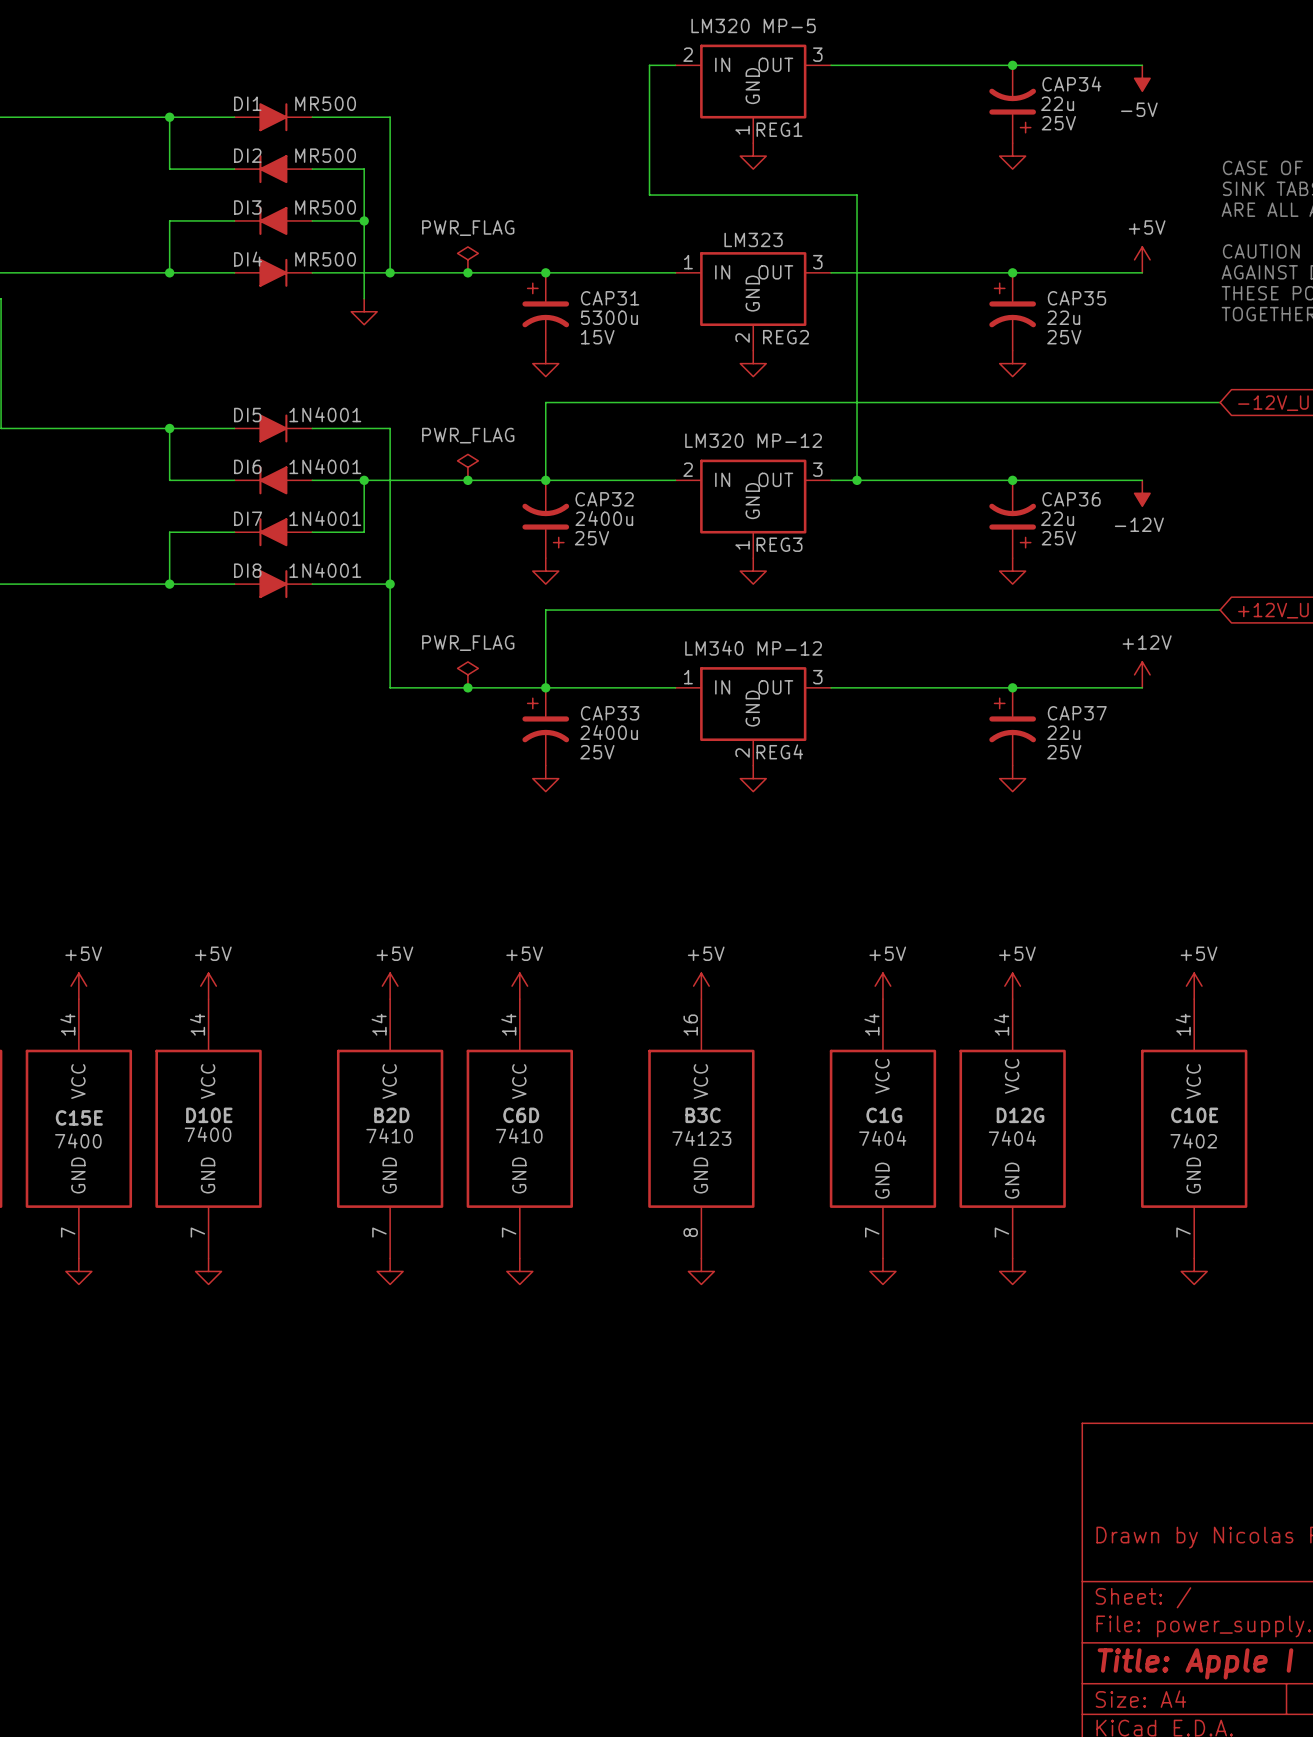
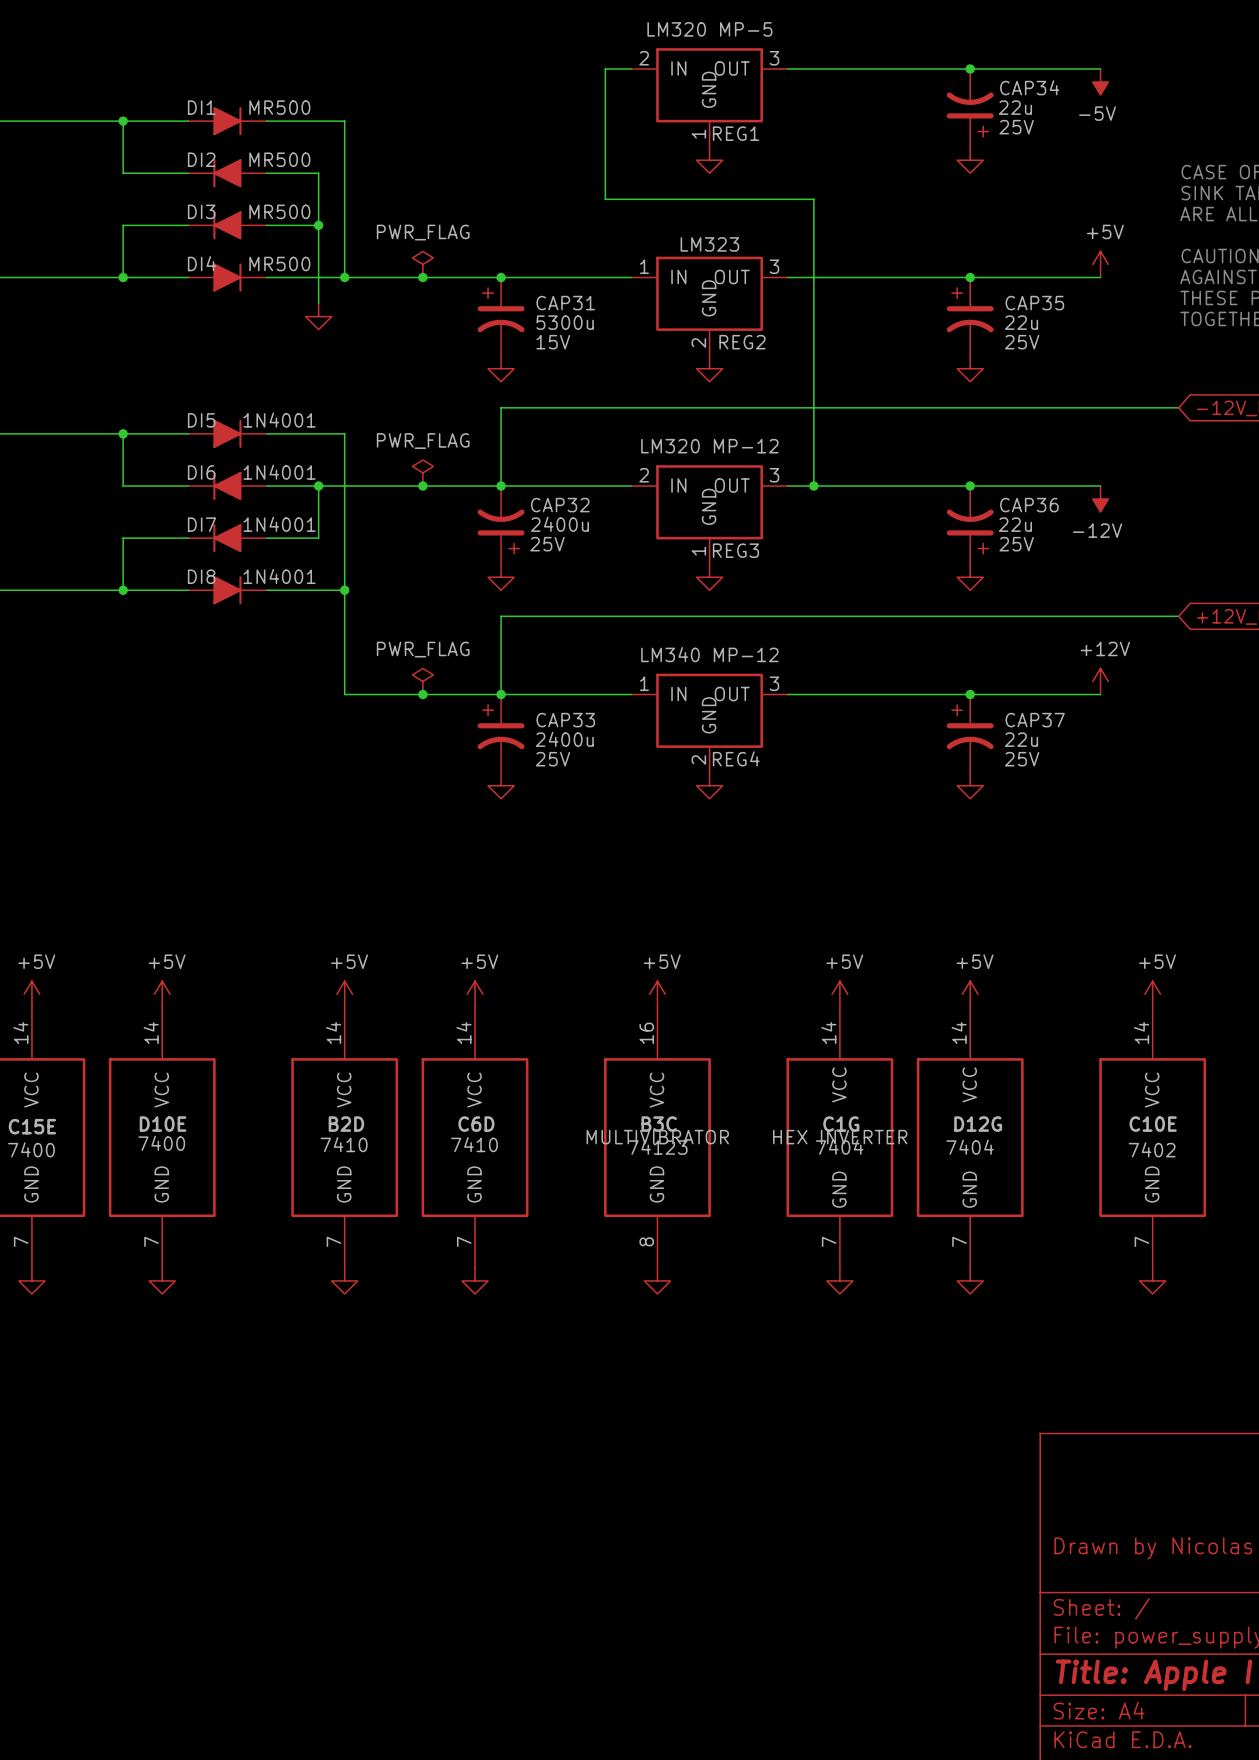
B3C text: none -> MULTIVIBRATOR (657, 1137)
C1G text: none -> HEX INVERTER (840, 1137)

